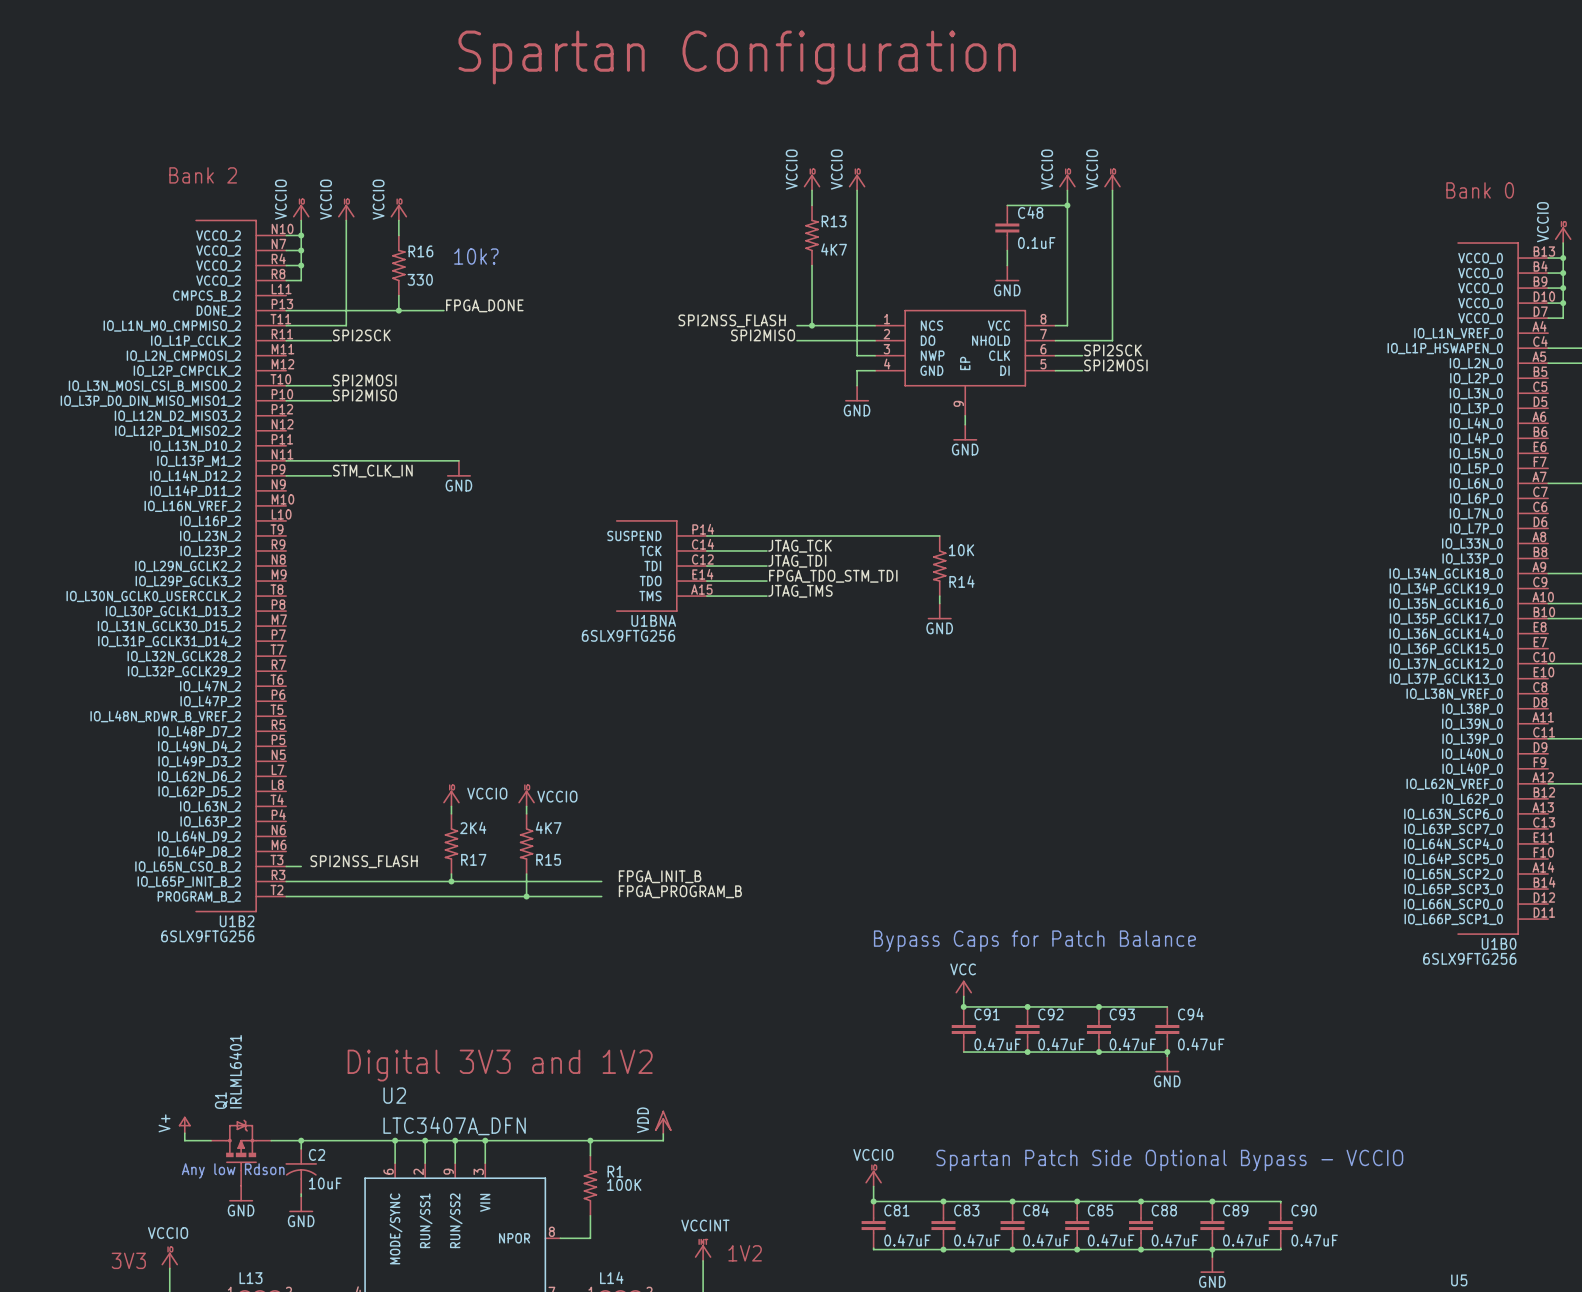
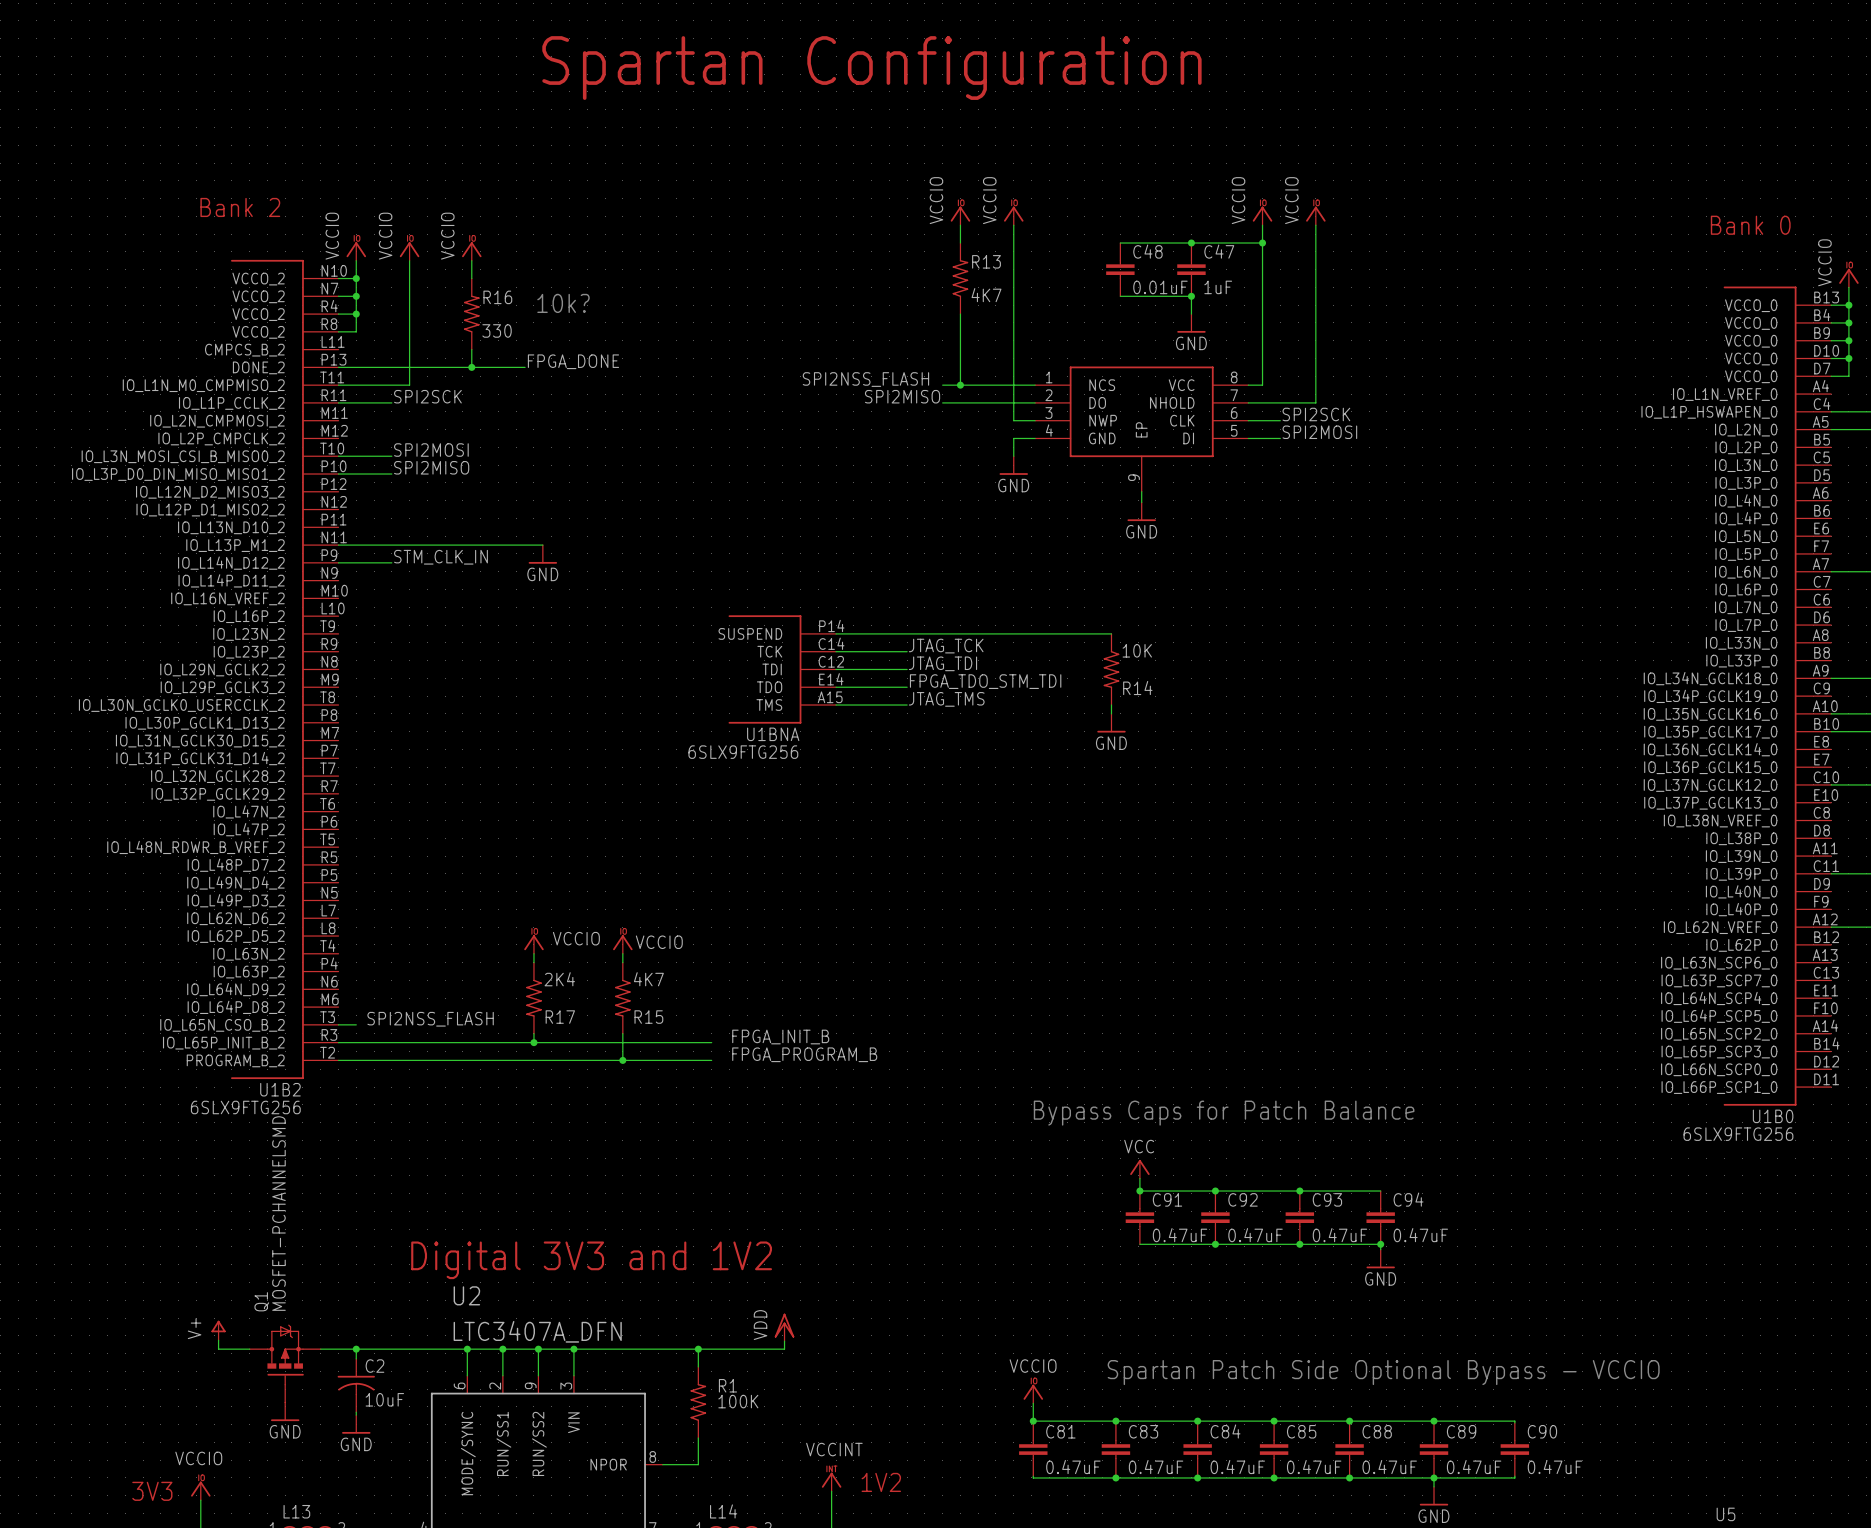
wire: none -> (1120, 243) (1191, 243)
junction: none -> (1191, 243)
C48 name: C48 (1030, 212) -> C47 (1219, 251)
C48: none -> 0.01uF (1120, 269)
C48 value: 0.1uF (1036, 243) -> 1uF (1218, 287)
wire: none -> (1120, 296) (1191, 296)
junction: none -> (1191, 296)
Q1 value: IRLML6401 (235, 1071) -> MOSFET-PCHANNELSMD (278, 1213)
text: Any low Rdson (233, 1170) -> none

